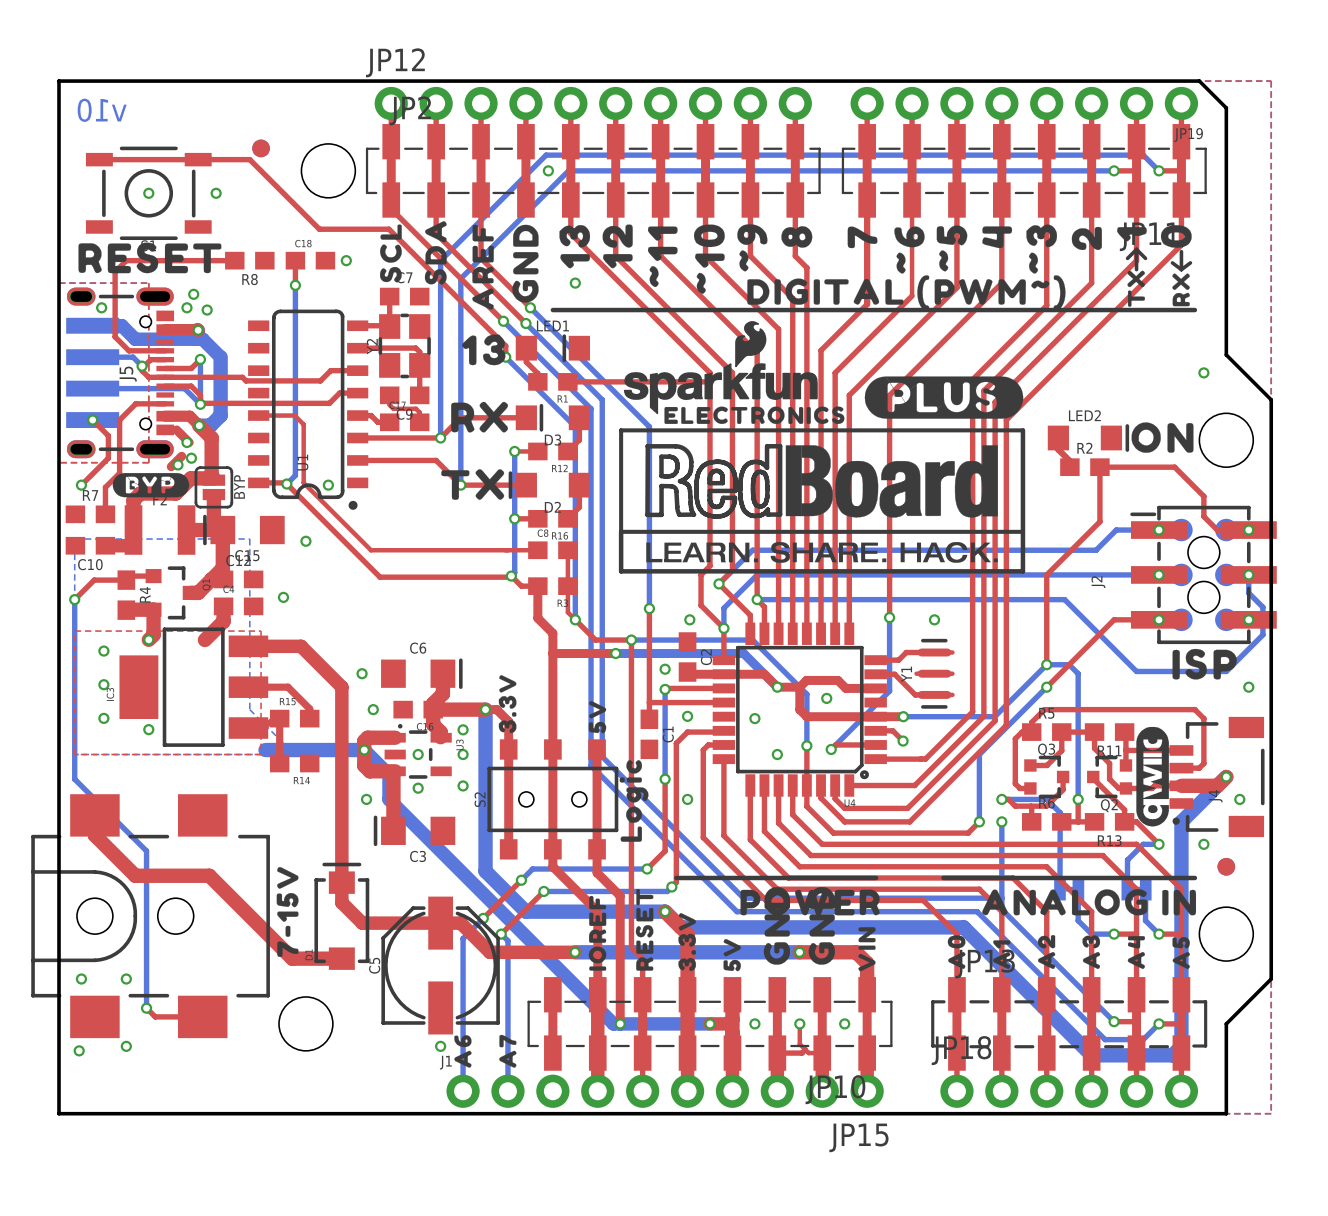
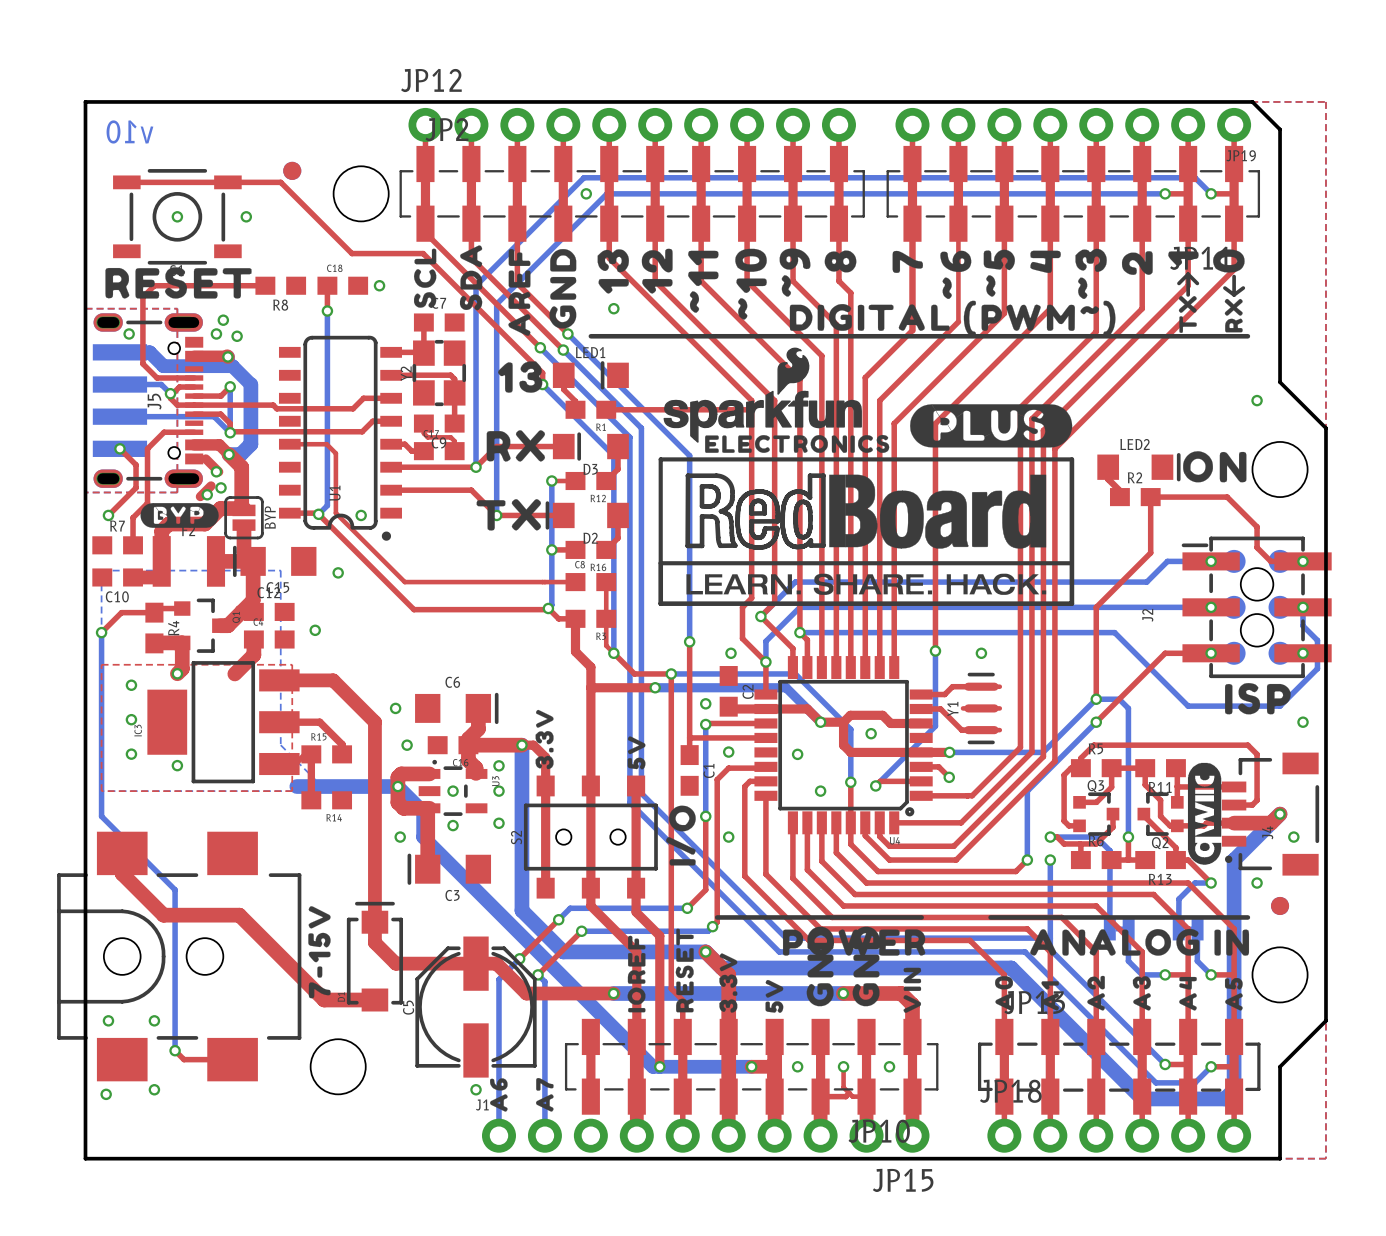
drawing shape: [619, 760, 649, 842] -> [666, 805, 696, 866]

